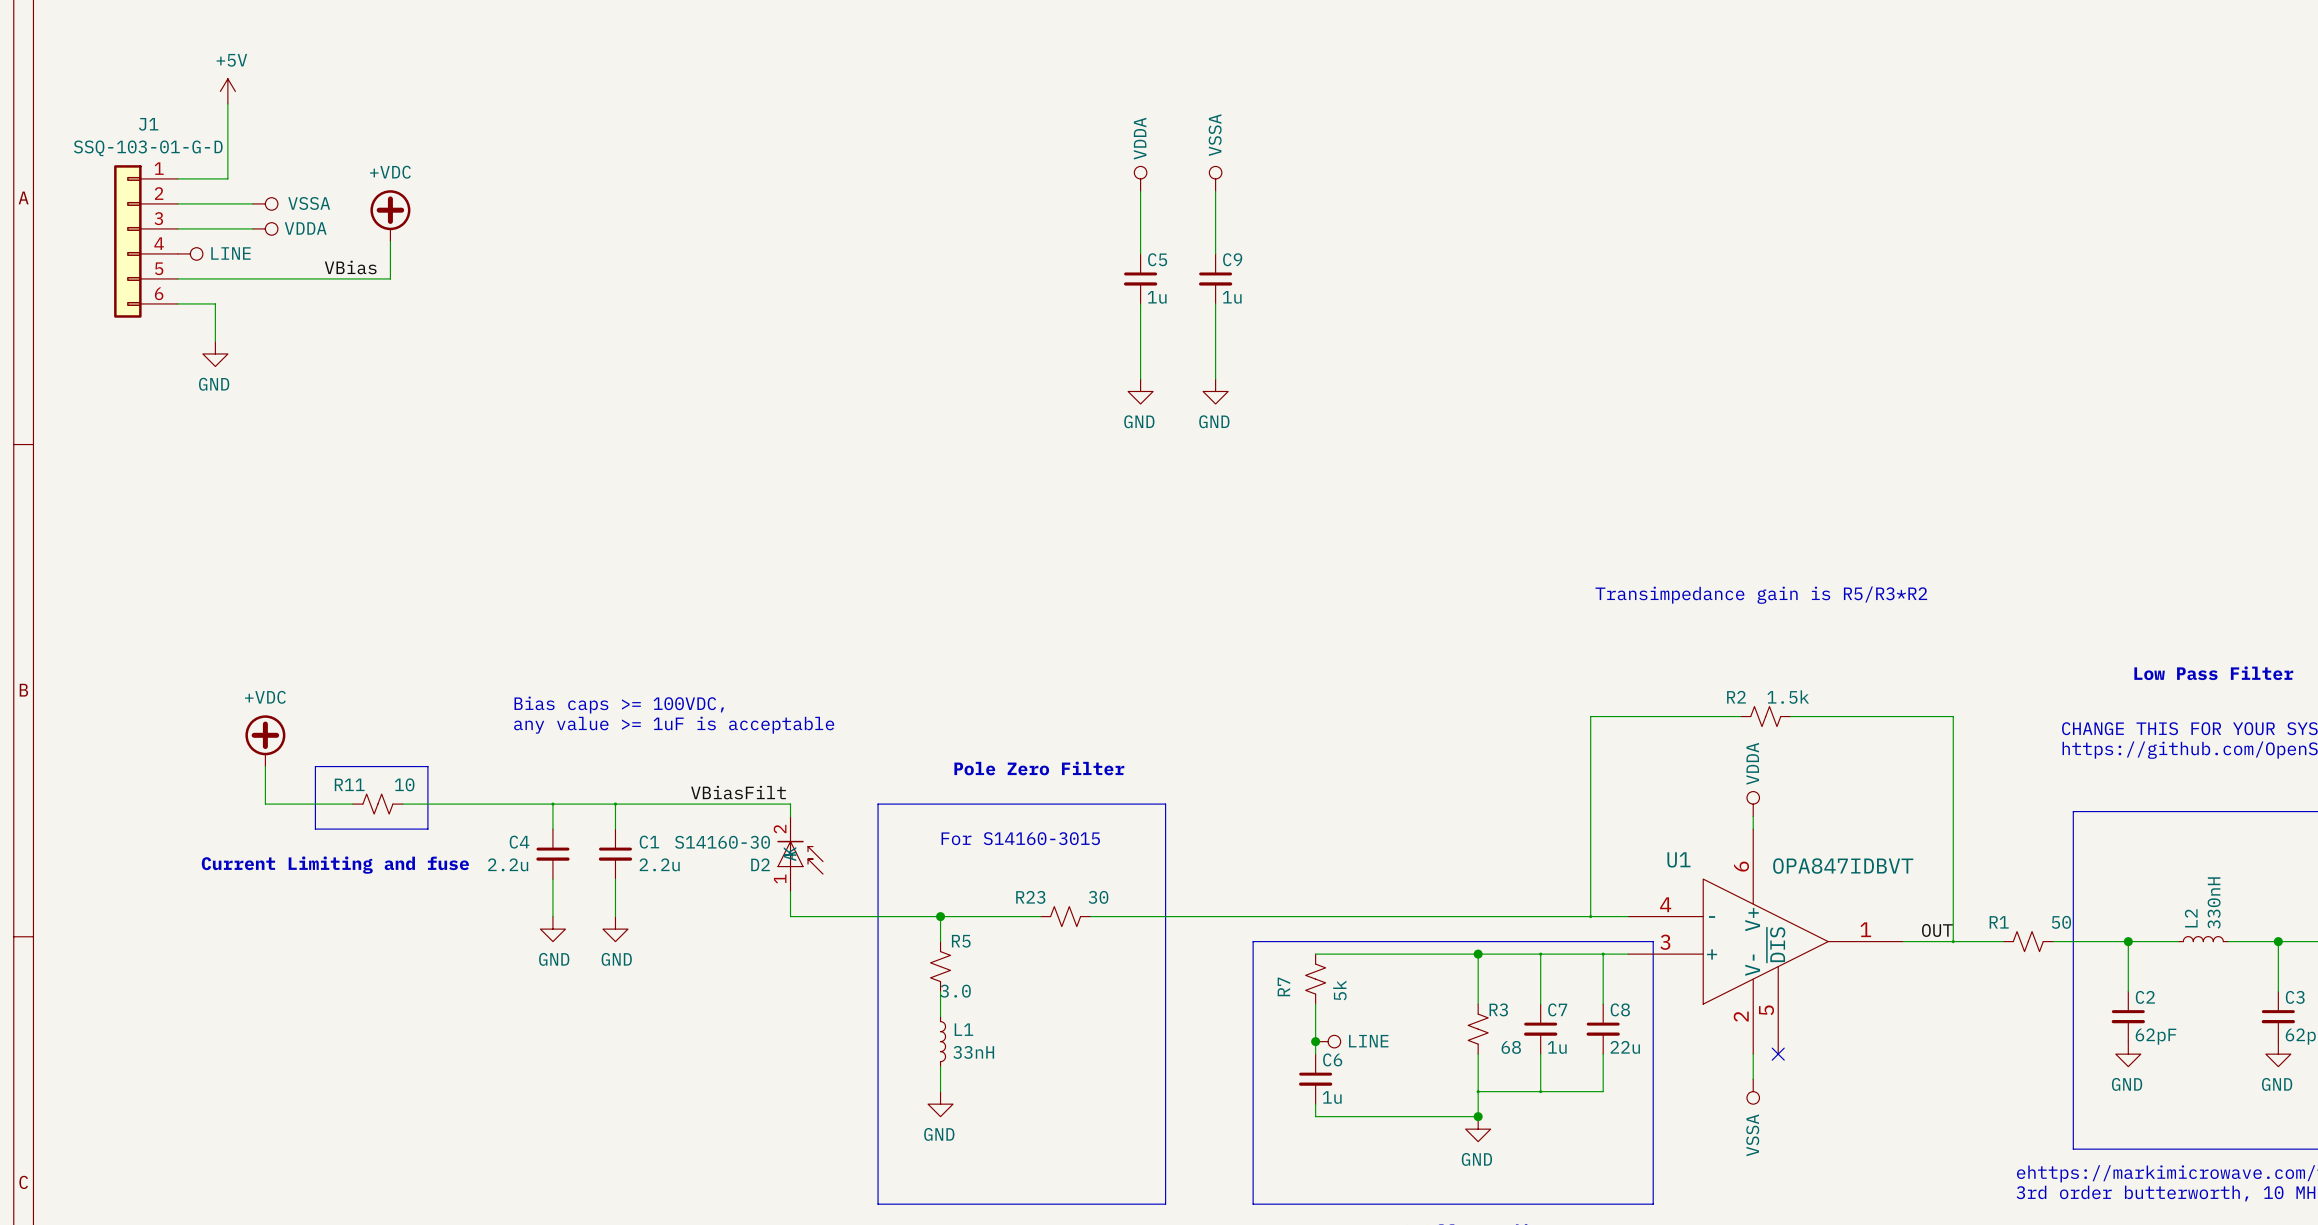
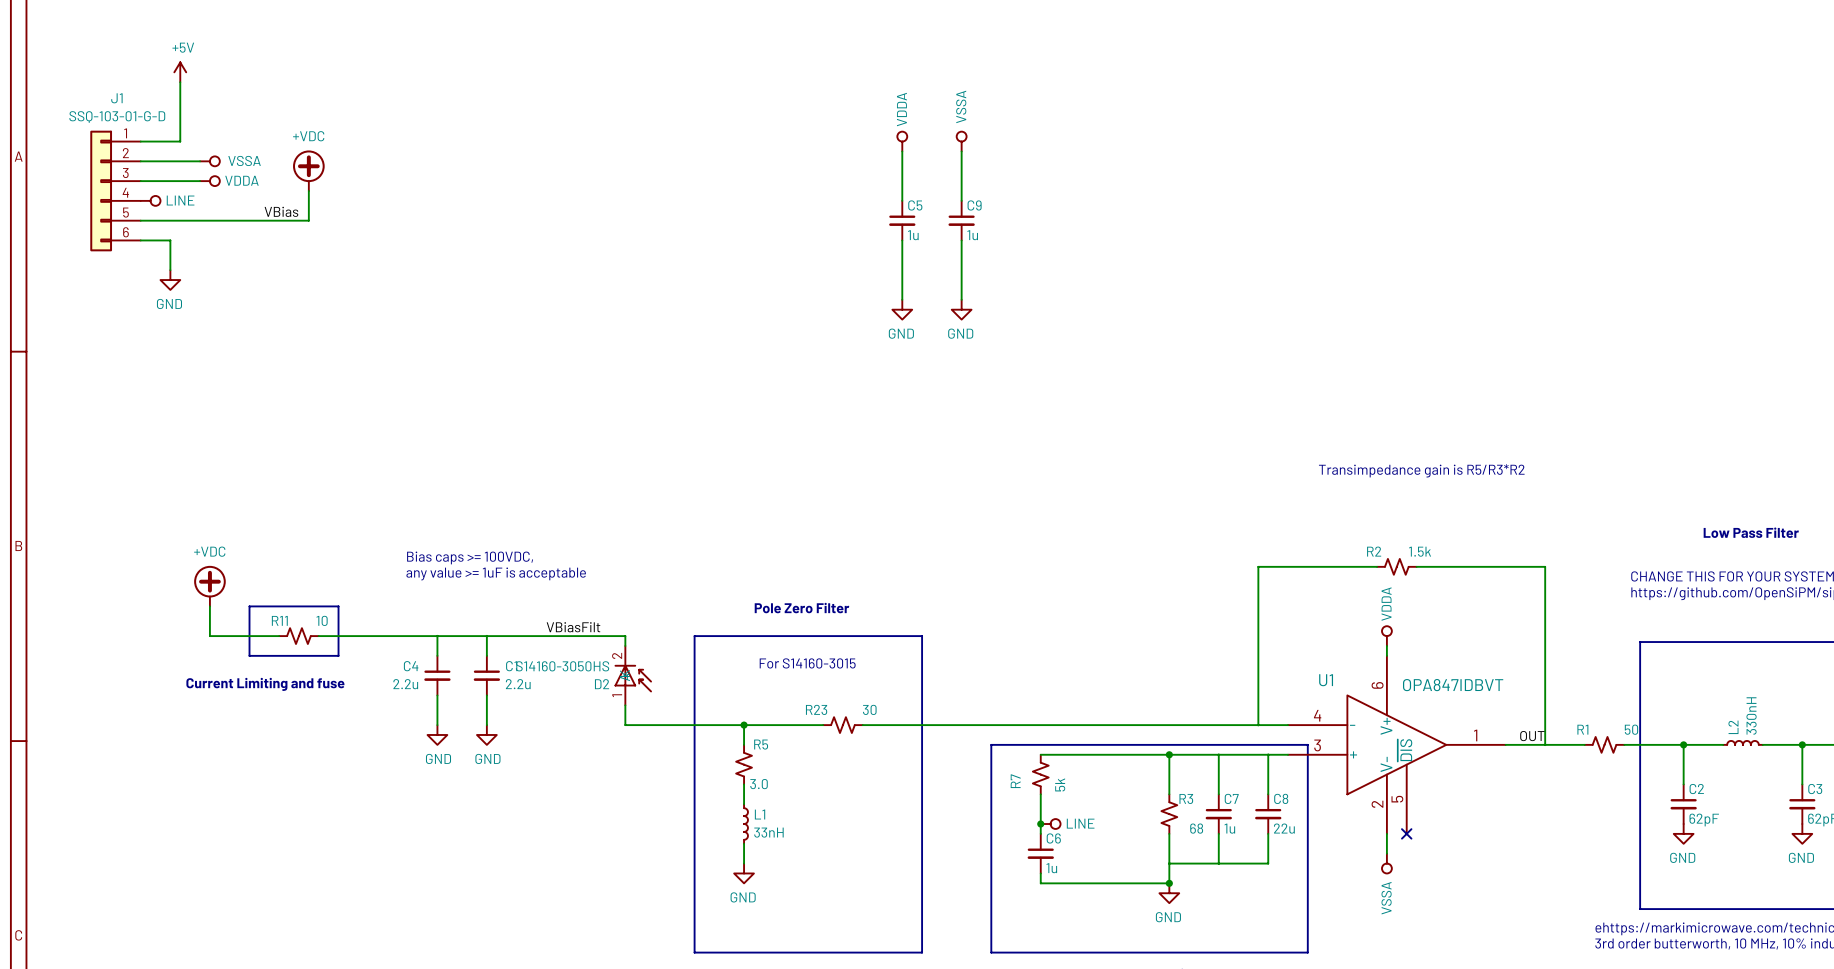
D2 value: S14160-30 (722, 842) -> S14160-3050HS (562, 666)

